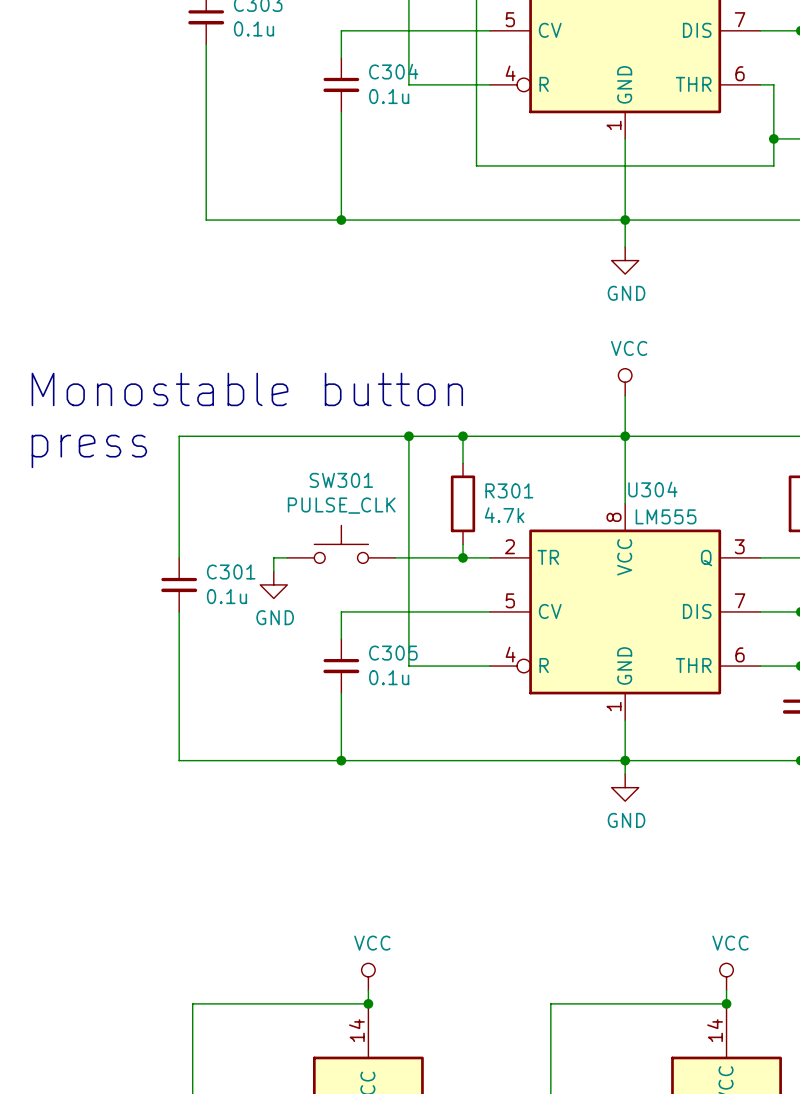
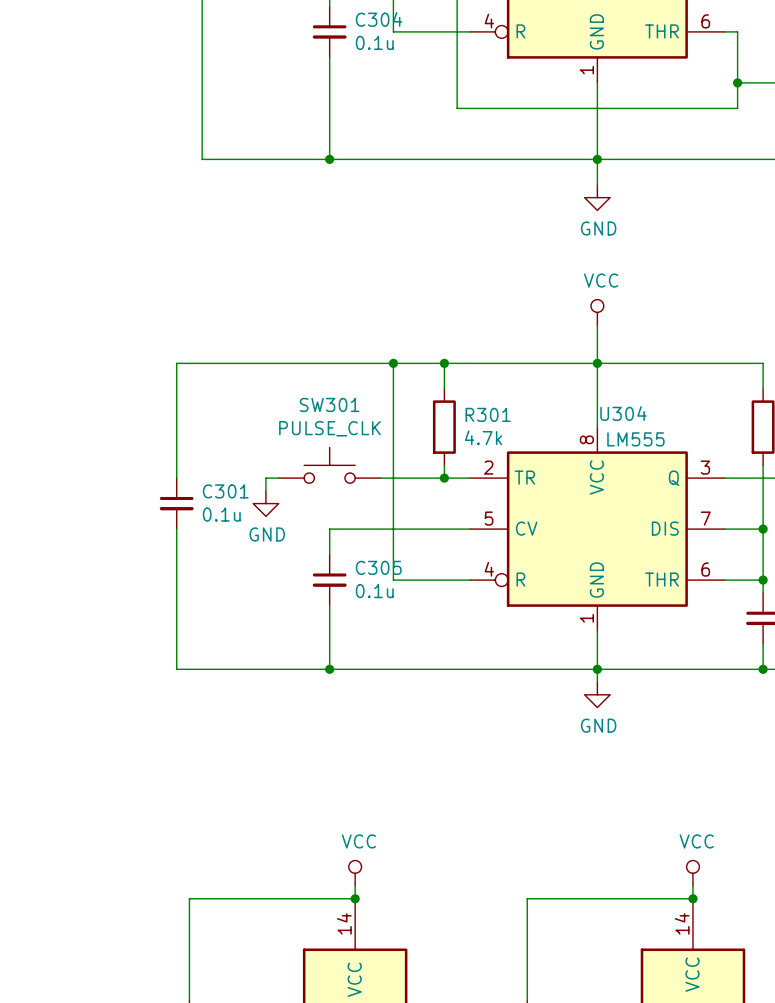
text: Monostable button (247, 389) -> none
text: press (89, 451) -> none

